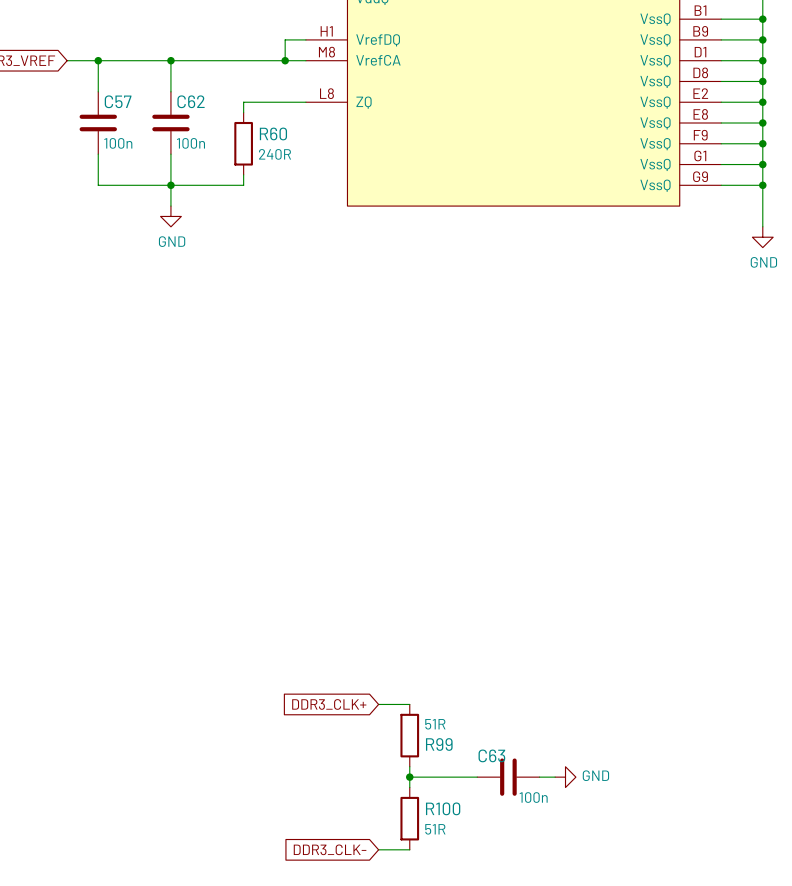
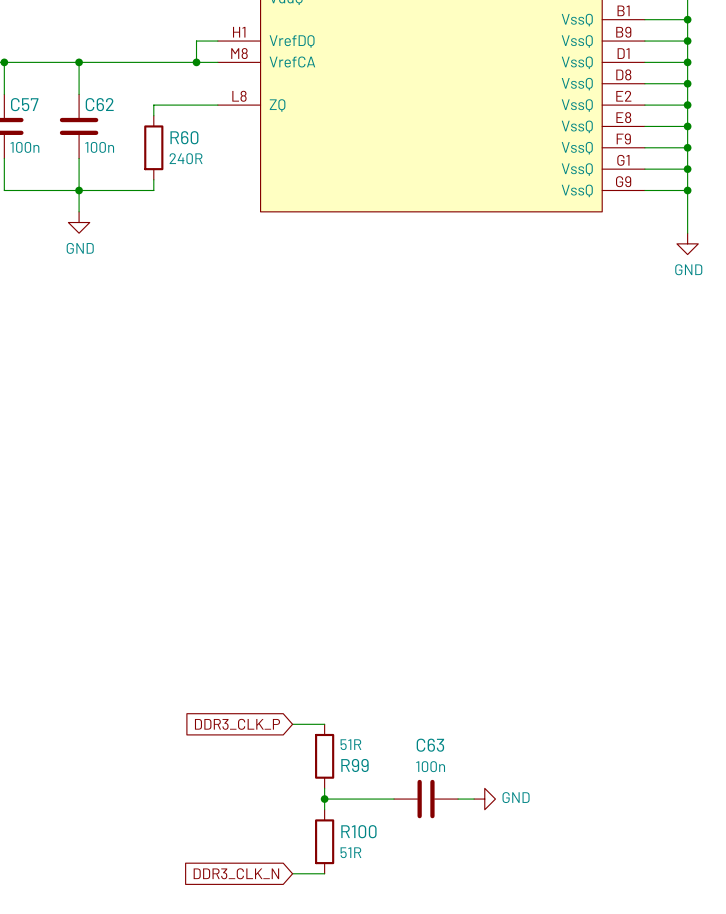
global label: DDR3_CLK+ (329, 704) -> DDR3_CLK_P (237, 724)
C63 name position: C63 (491, 755) -> C63 (430, 745)
C63 text position: 100n (533, 797) -> 100n (430, 766)
global label: DDR3_CLK- (330, 849) -> DDR3_CLK_N (236, 873)

